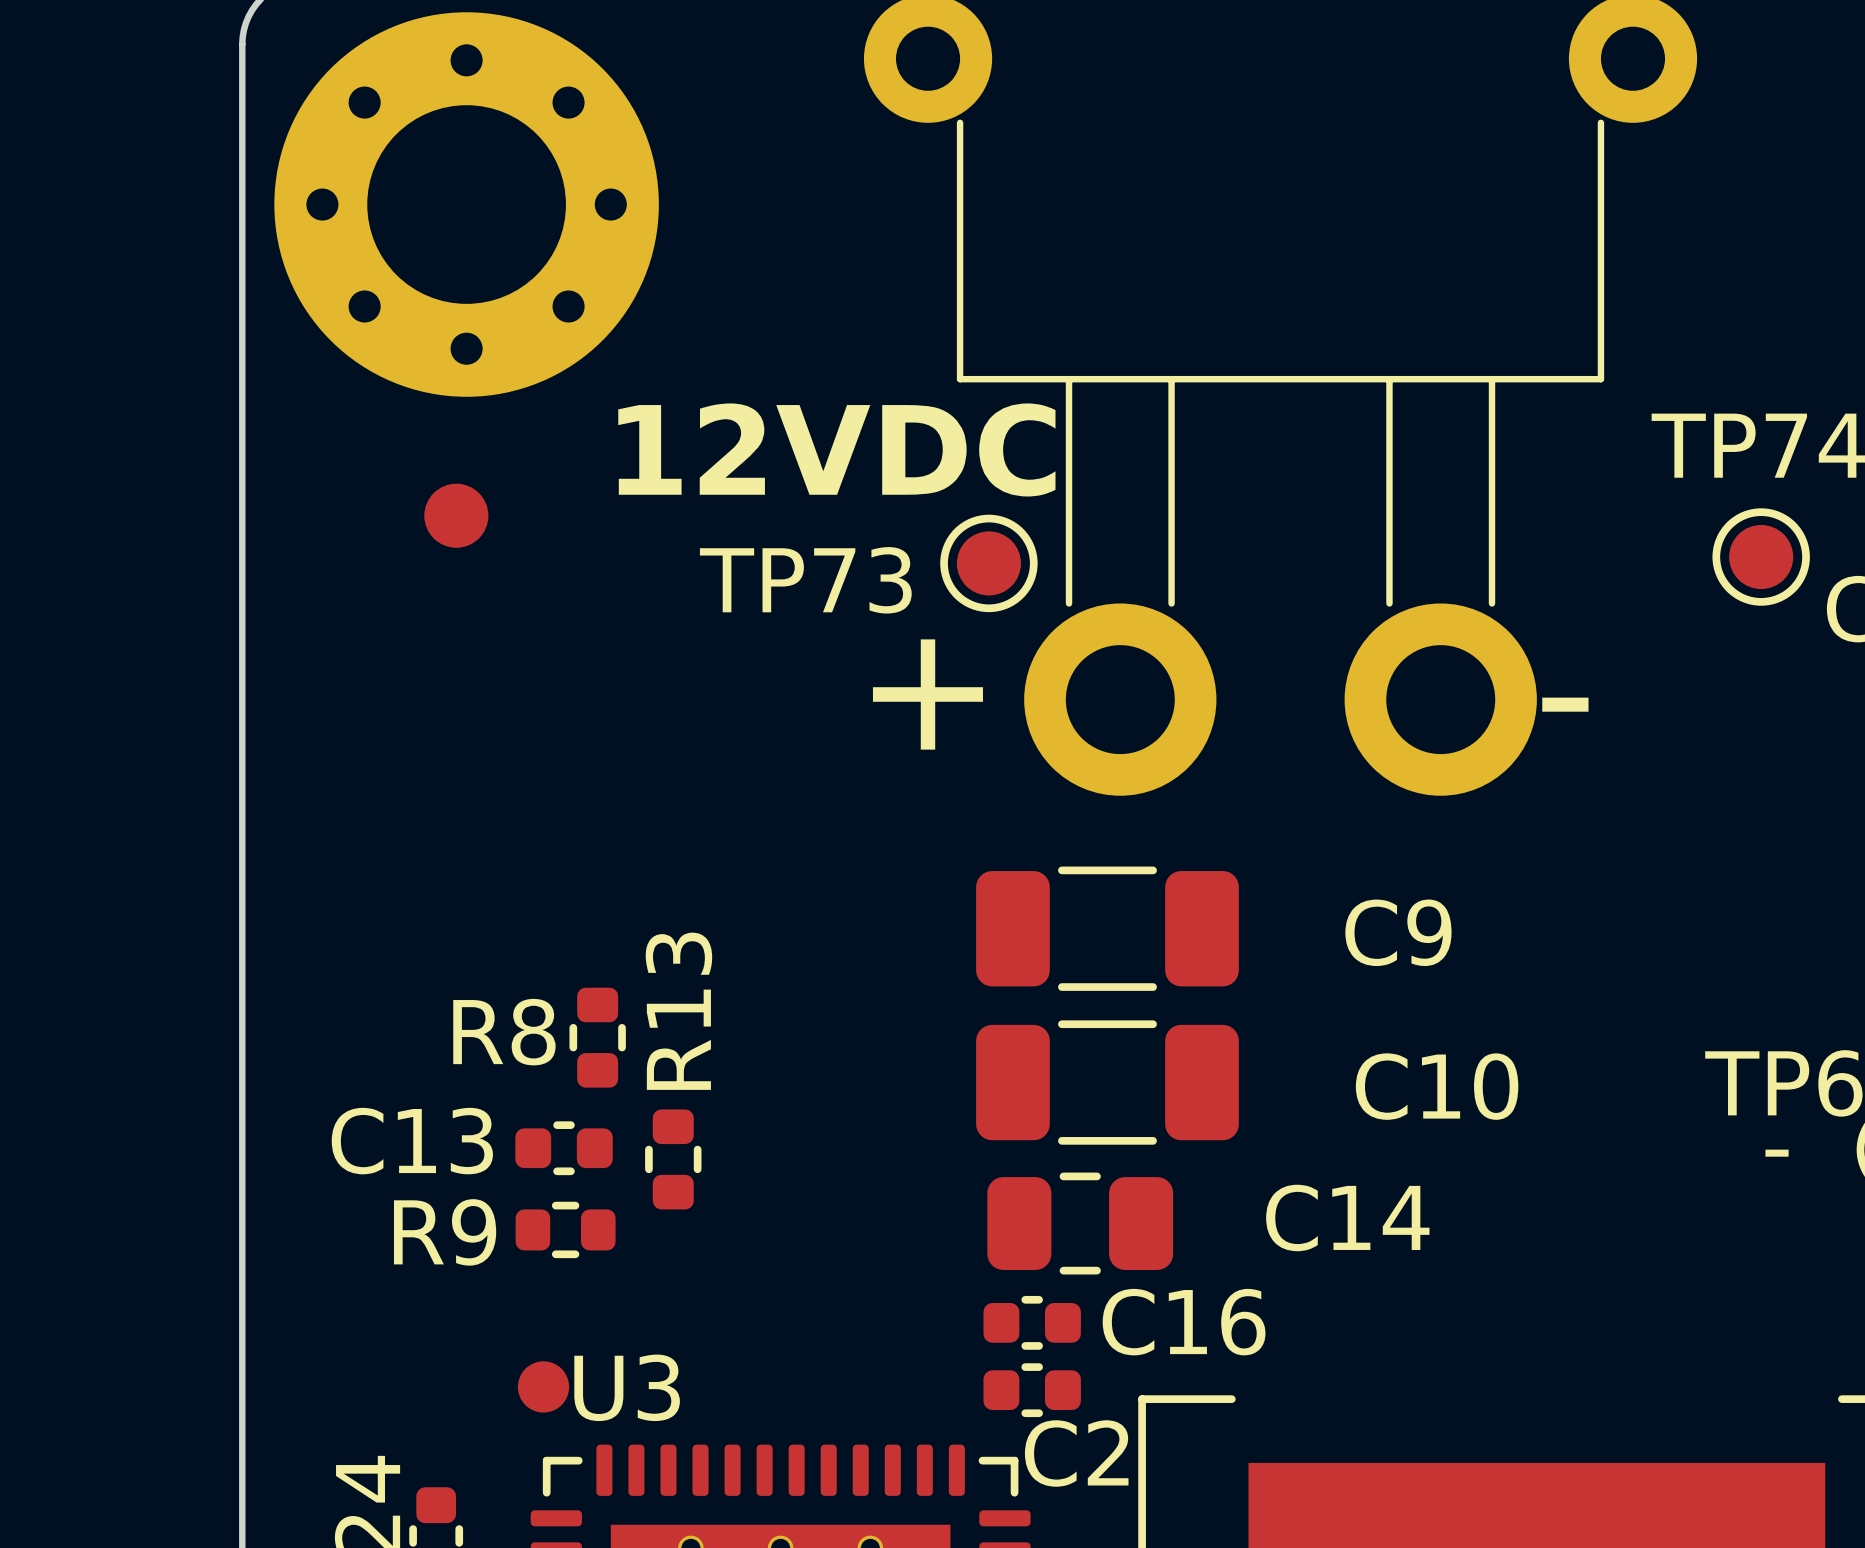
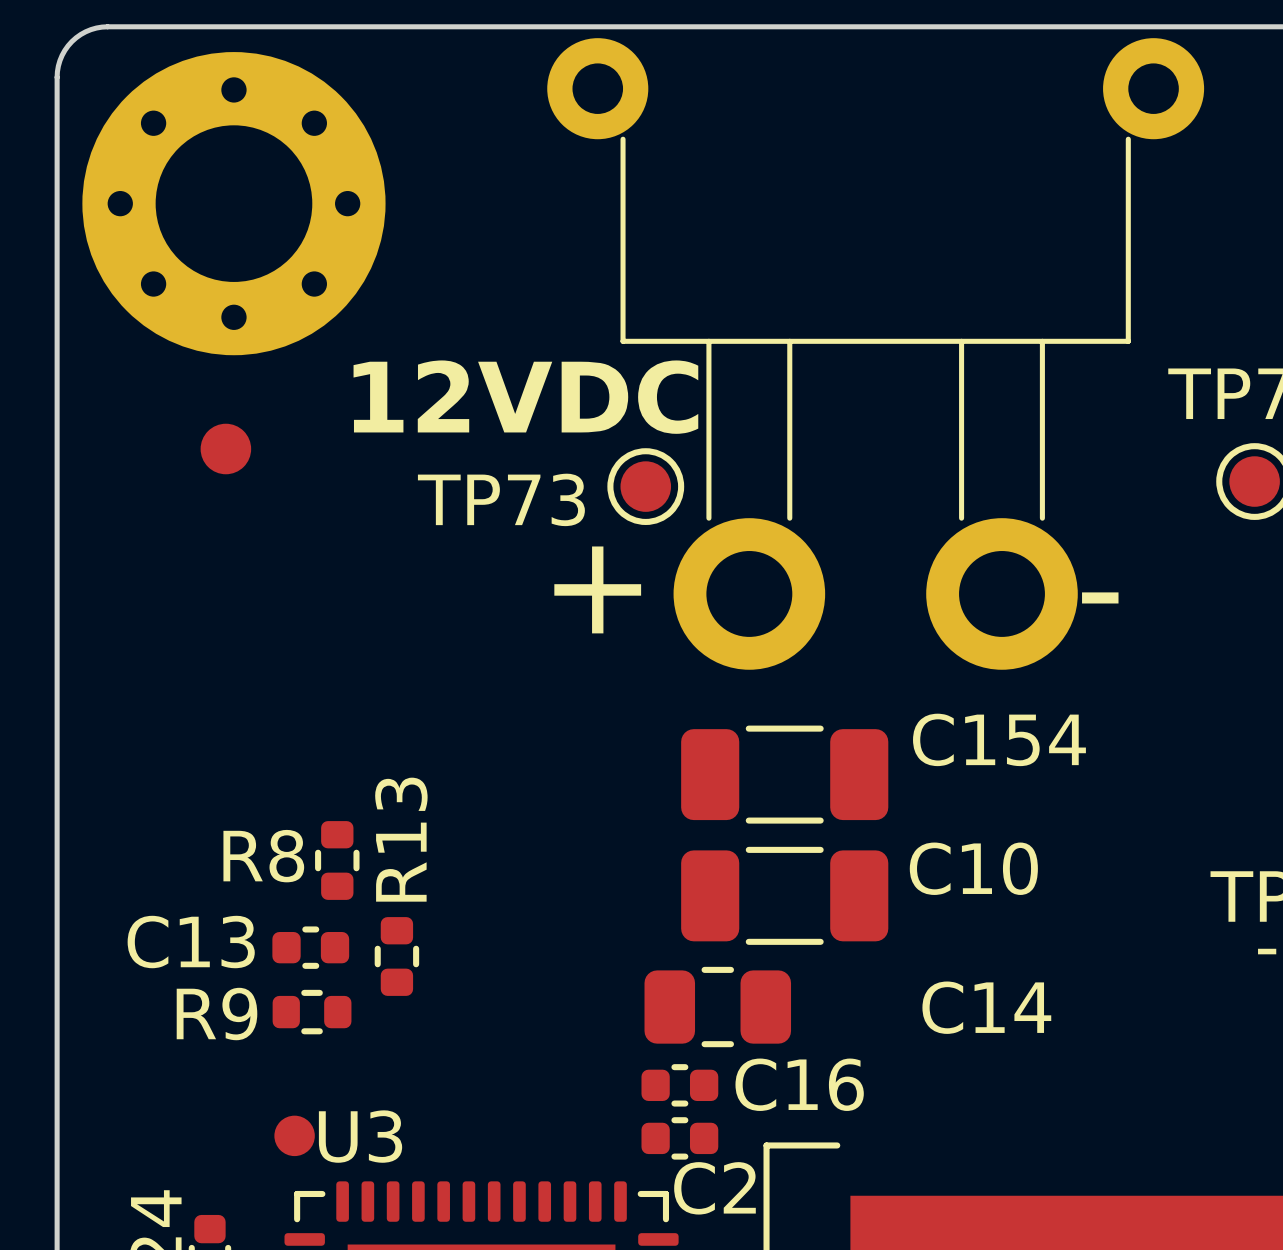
C9 position: (1107, 928) -> (784, 774)
C9 name: C9 (1398, 932) -> C154 (999, 739)
C10 position: (1107, 1082) -> (784, 895)
C10 name position: C10 (1437, 1086) -> C10 (973, 868)
C14 name position: C14 (1347, 1217) -> C14 (986, 1007)

